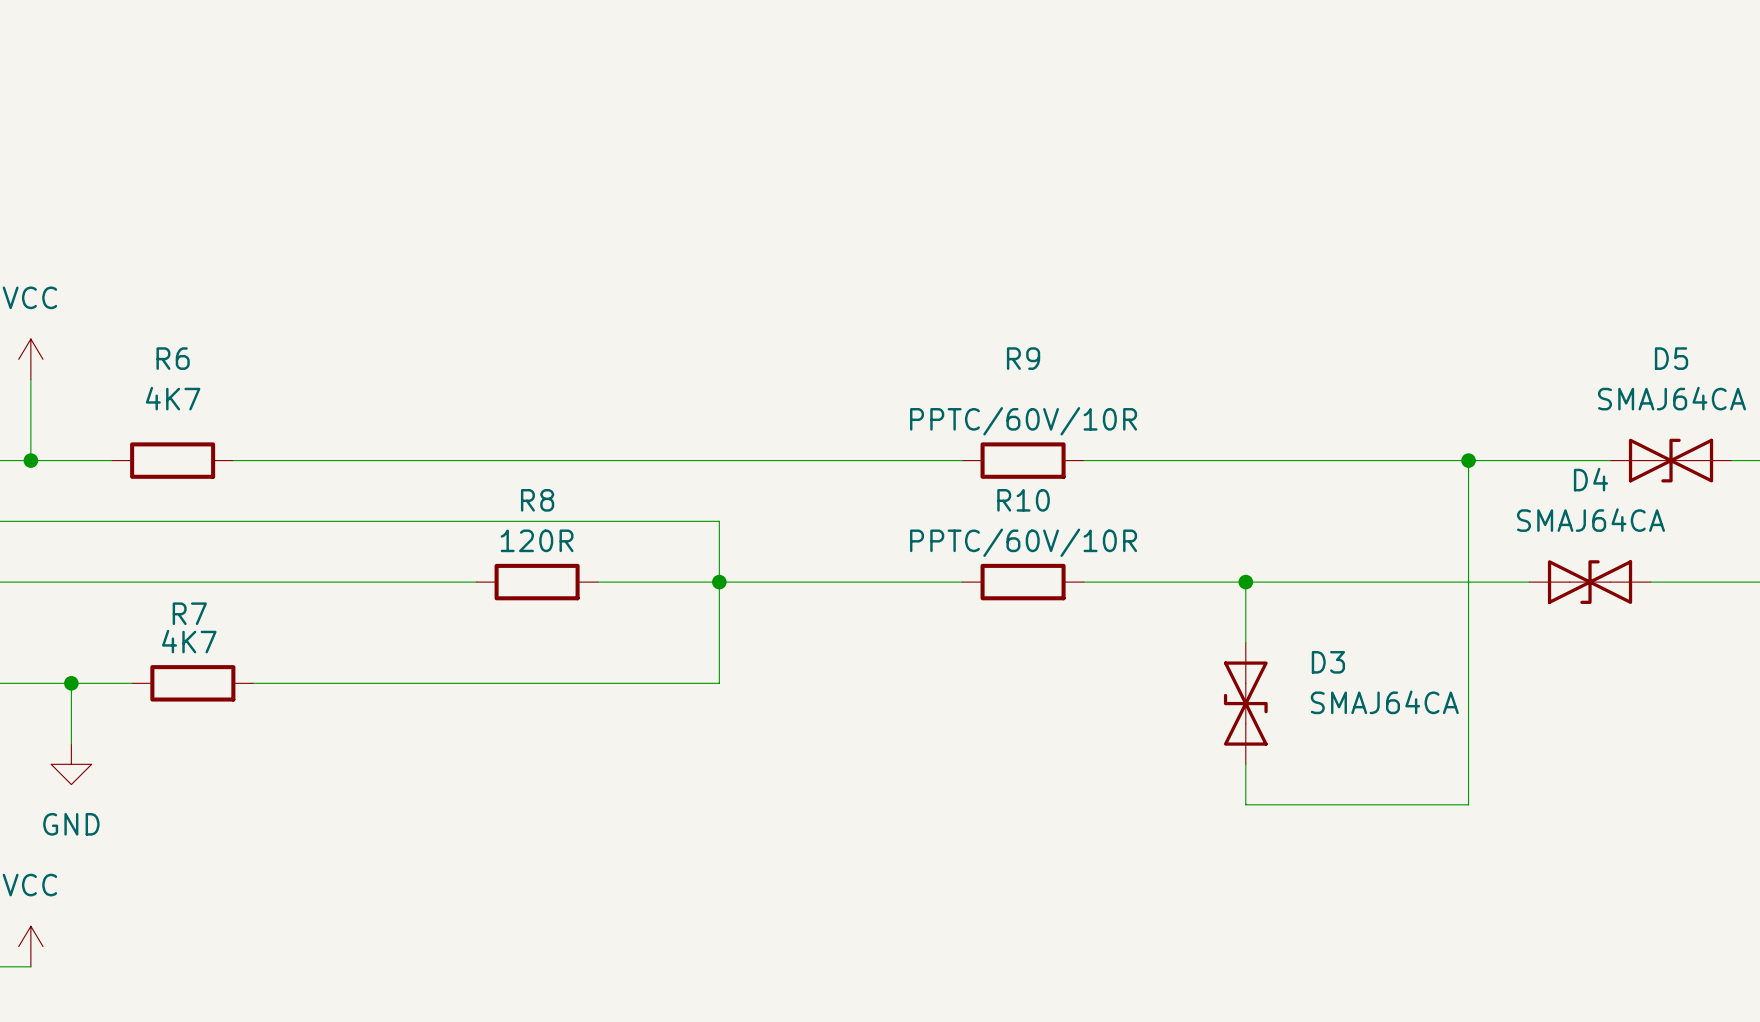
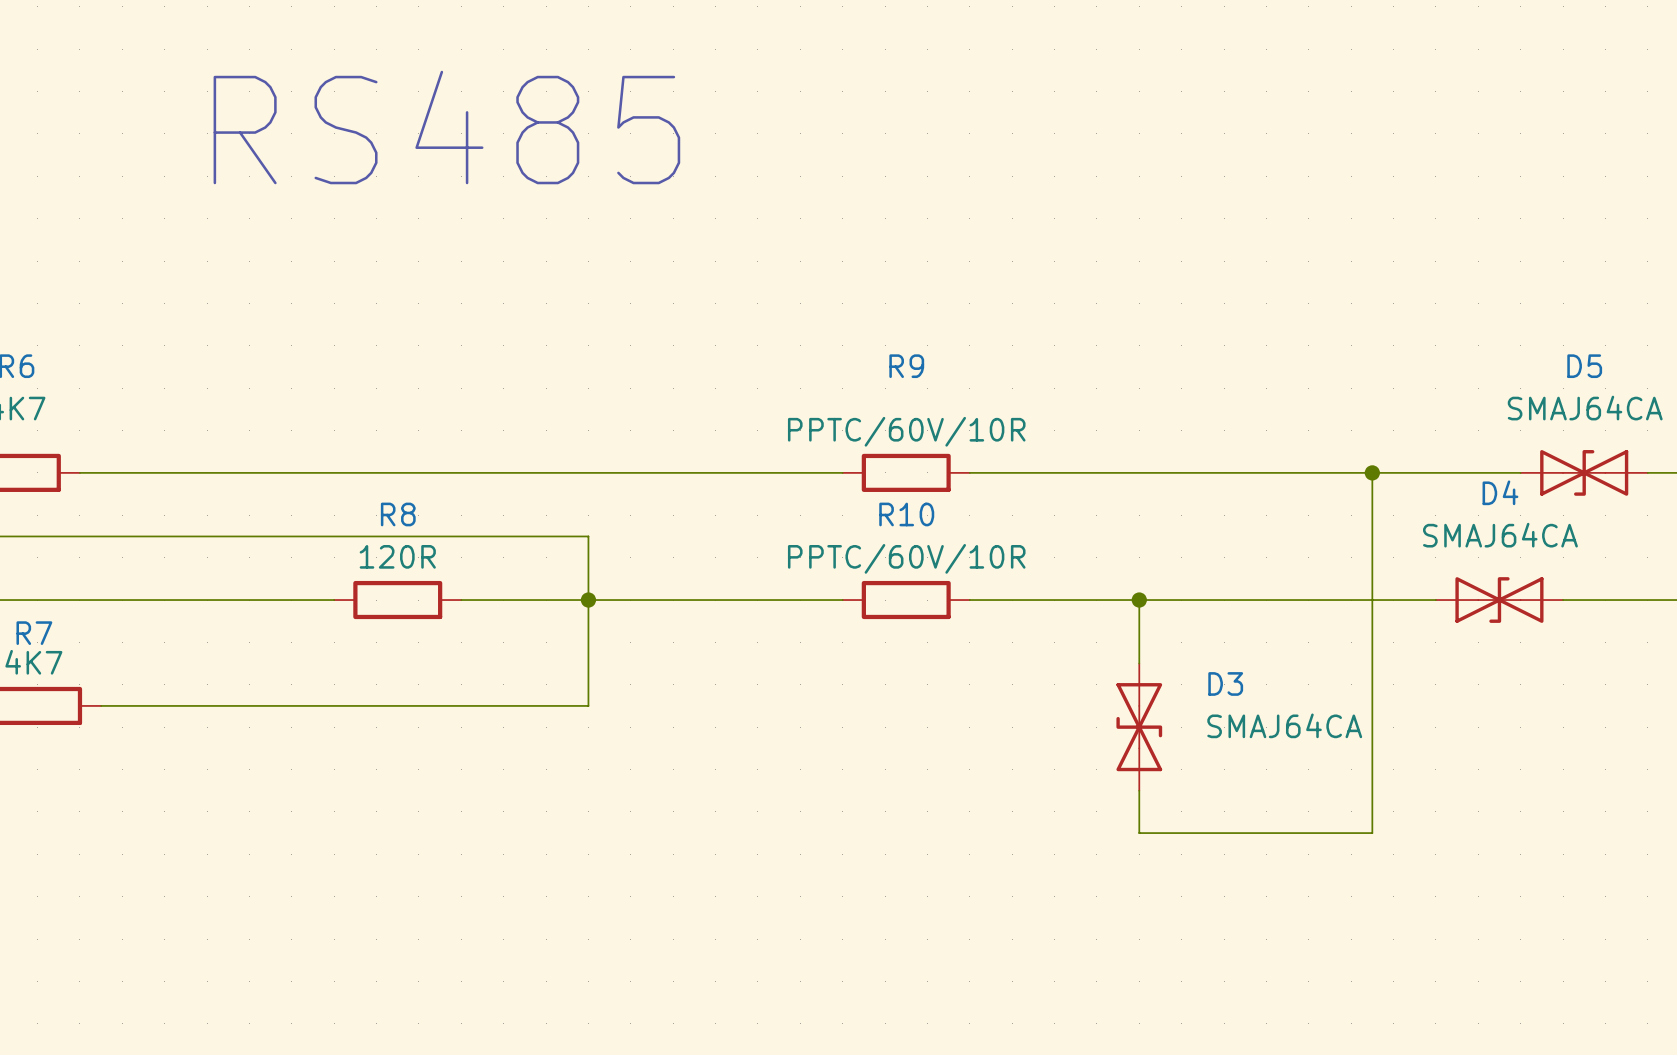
text: none -> RS485 (446, 127)

